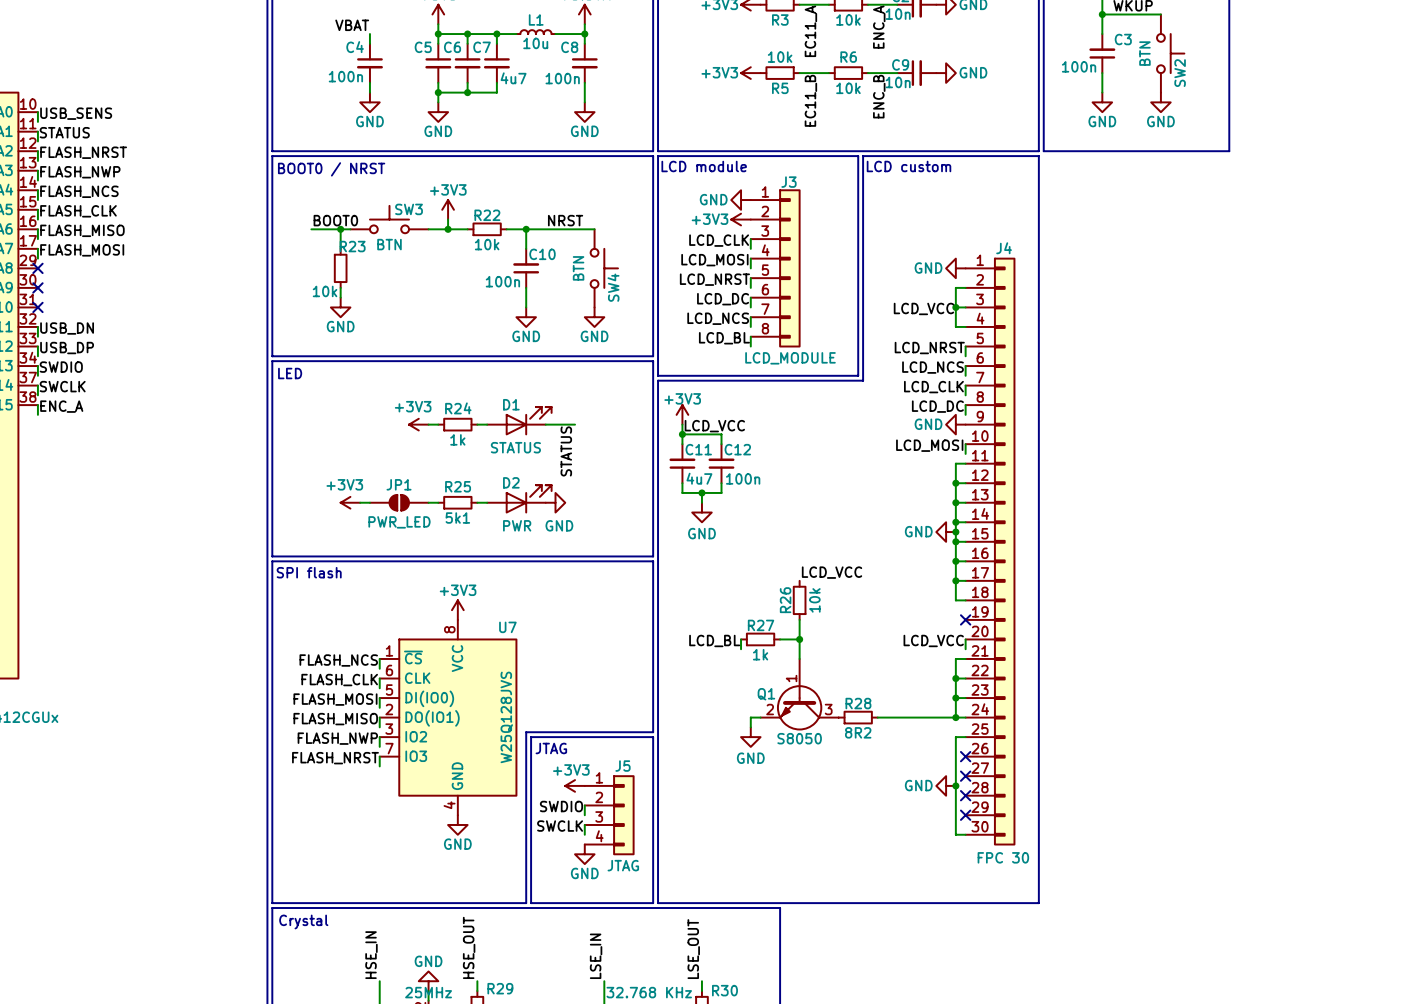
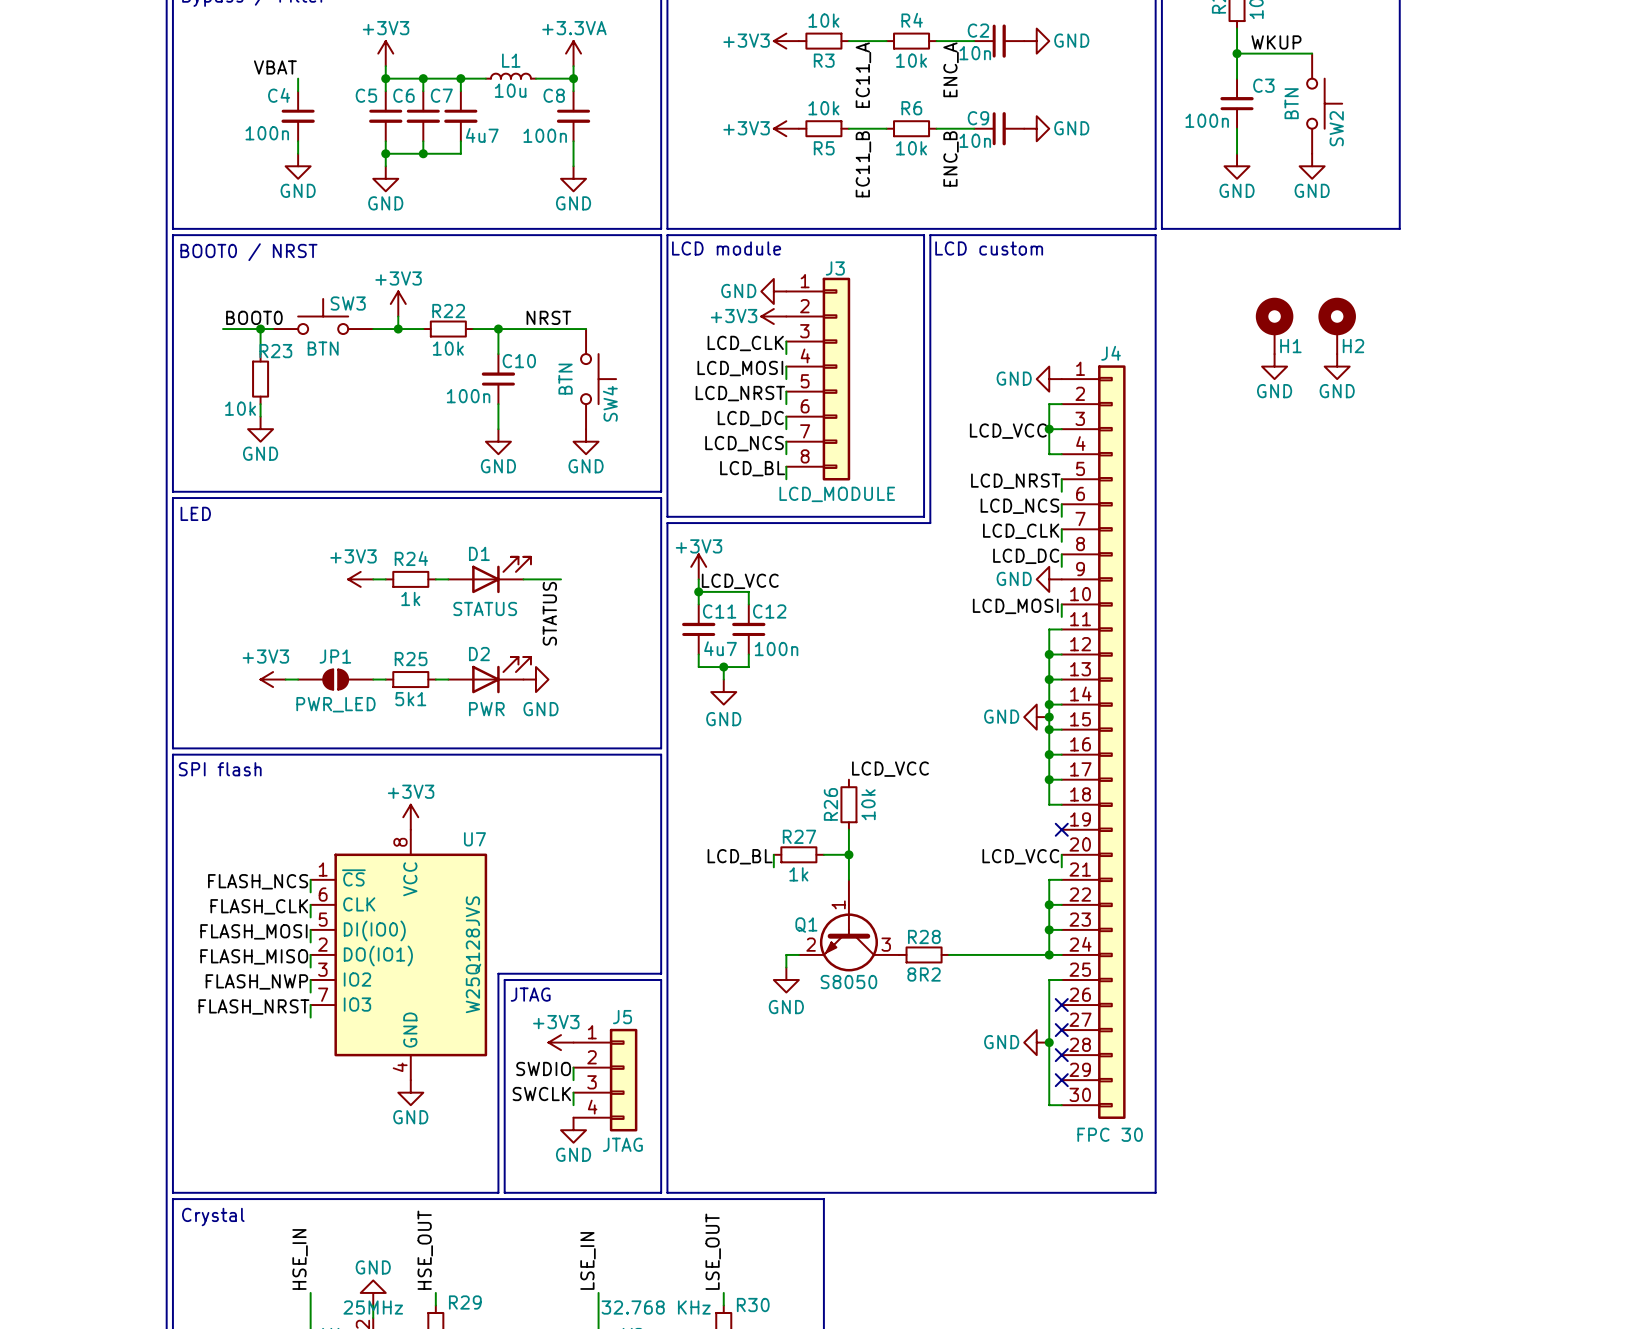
H1: none -> (1274, 325)
H2: none -> (1337, 325)
power symbol: none -> GND (1274, 366)
power symbol: none -> GND (1337, 366)

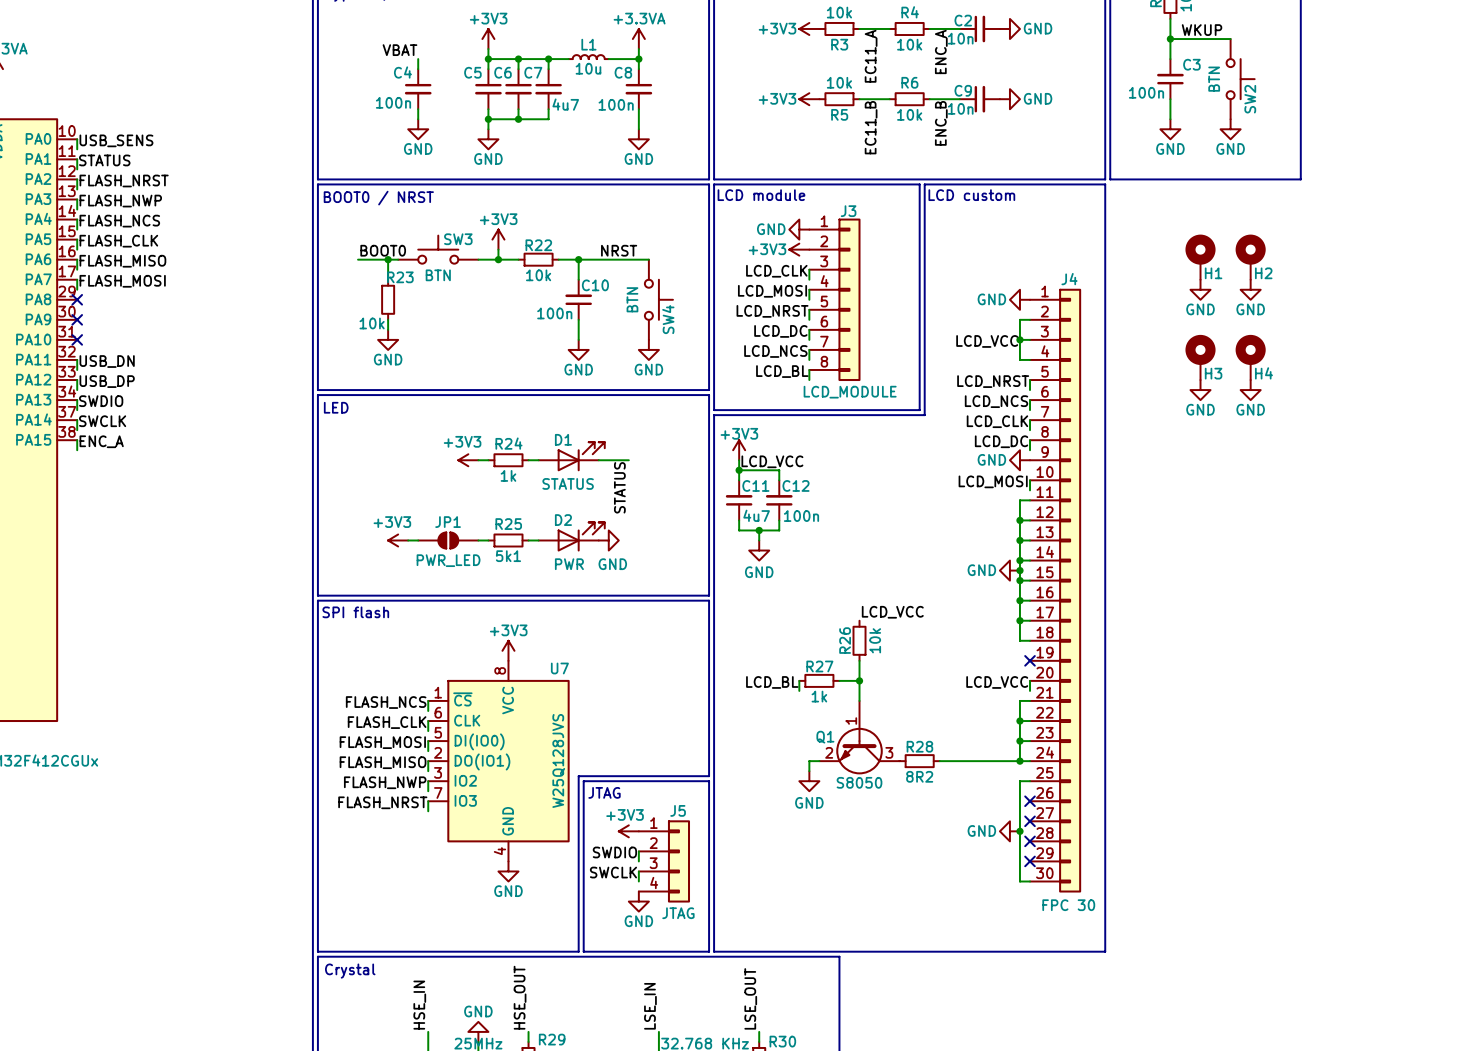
H3: none -> (1200, 357)
H4: none -> (1250, 357)
power symbol: none -> GND (1200, 390)
power symbol: none -> GND (1250, 390)

